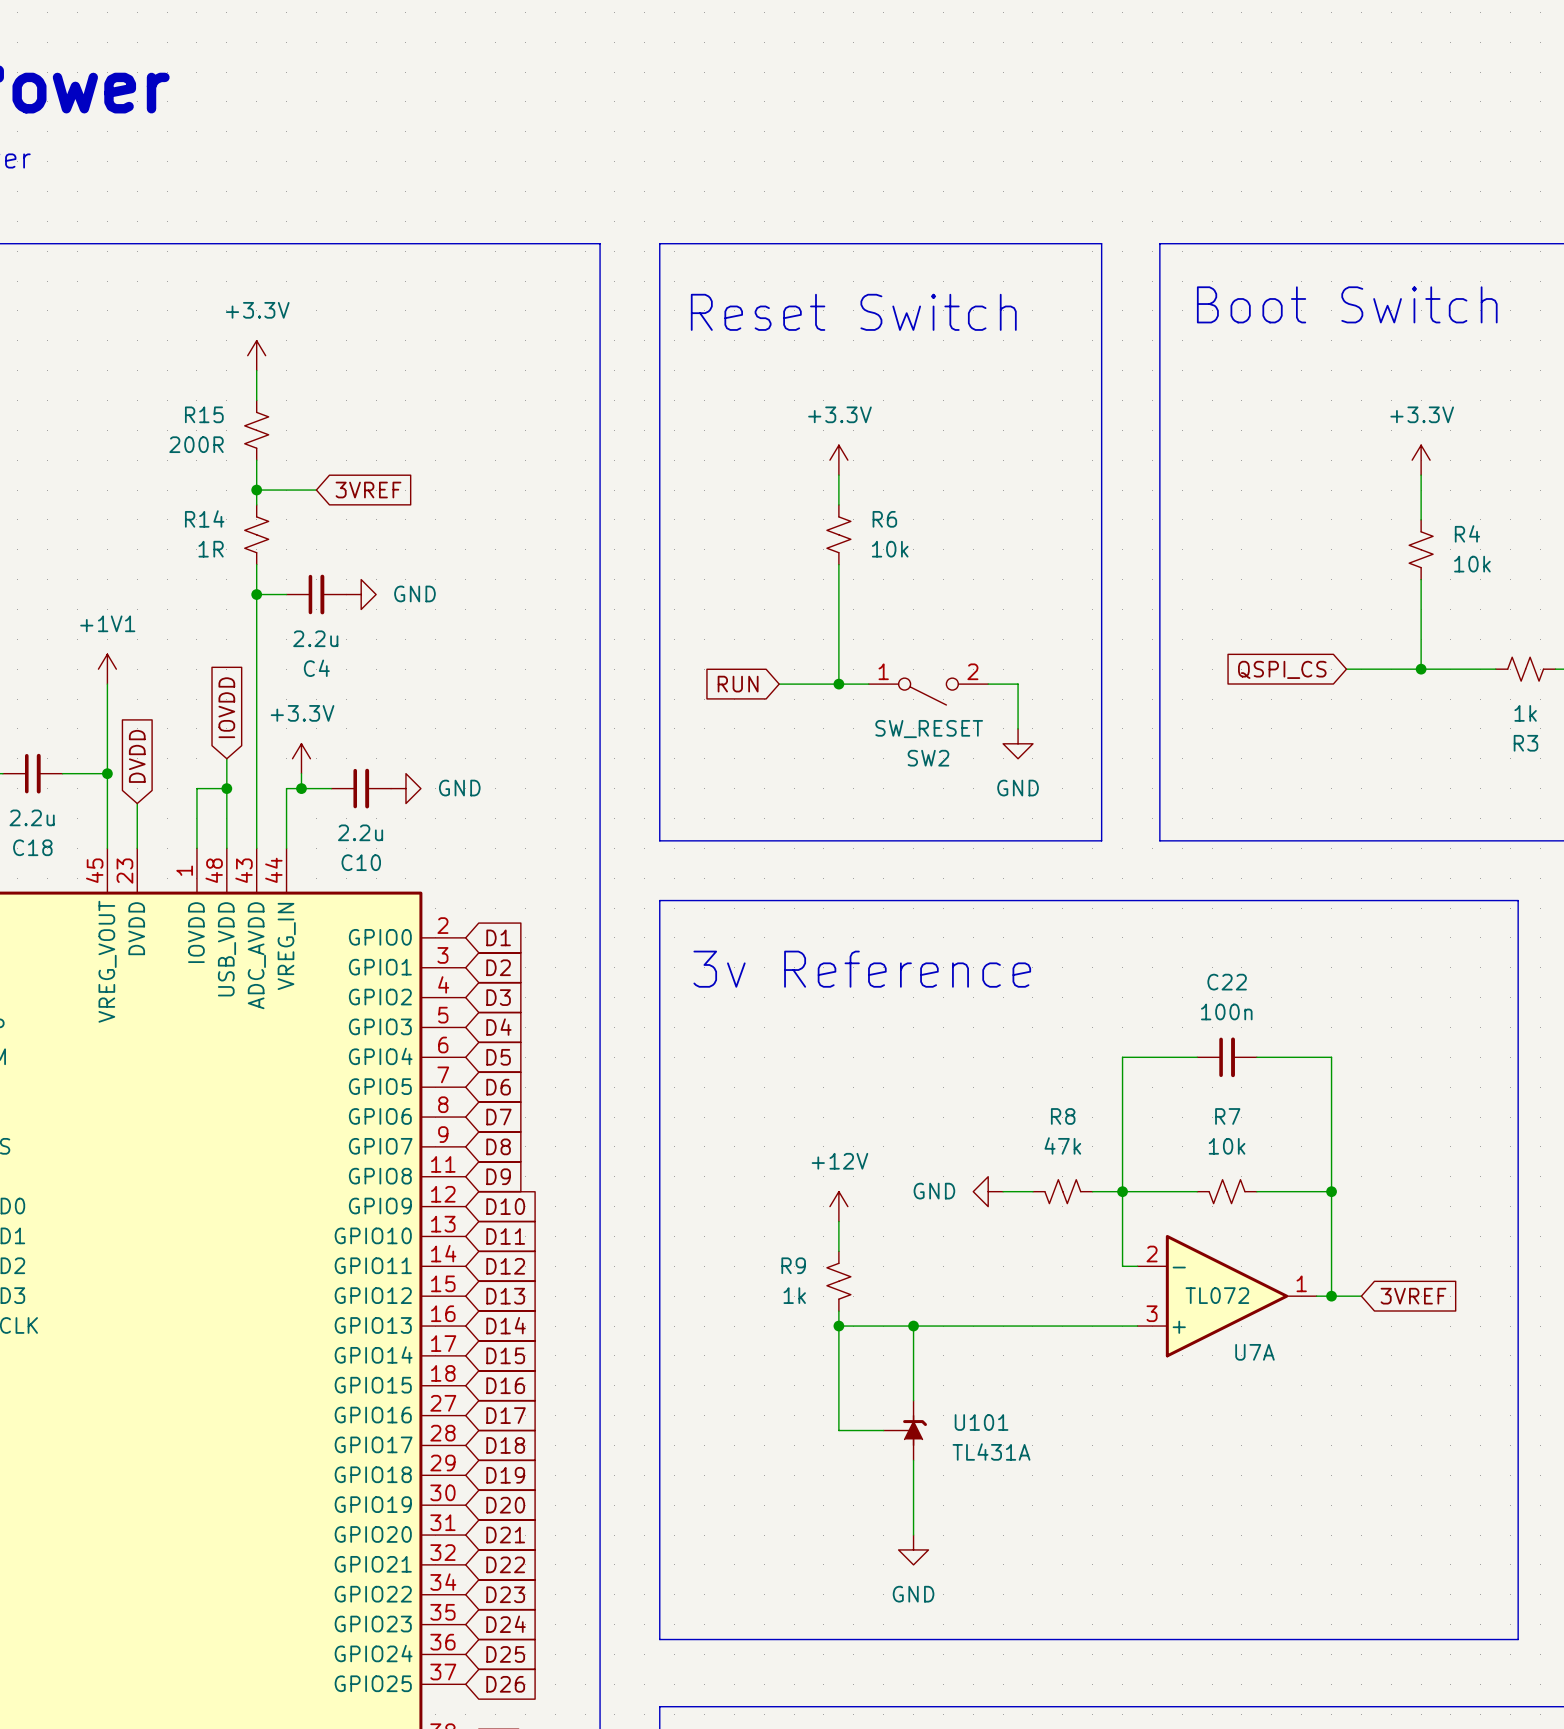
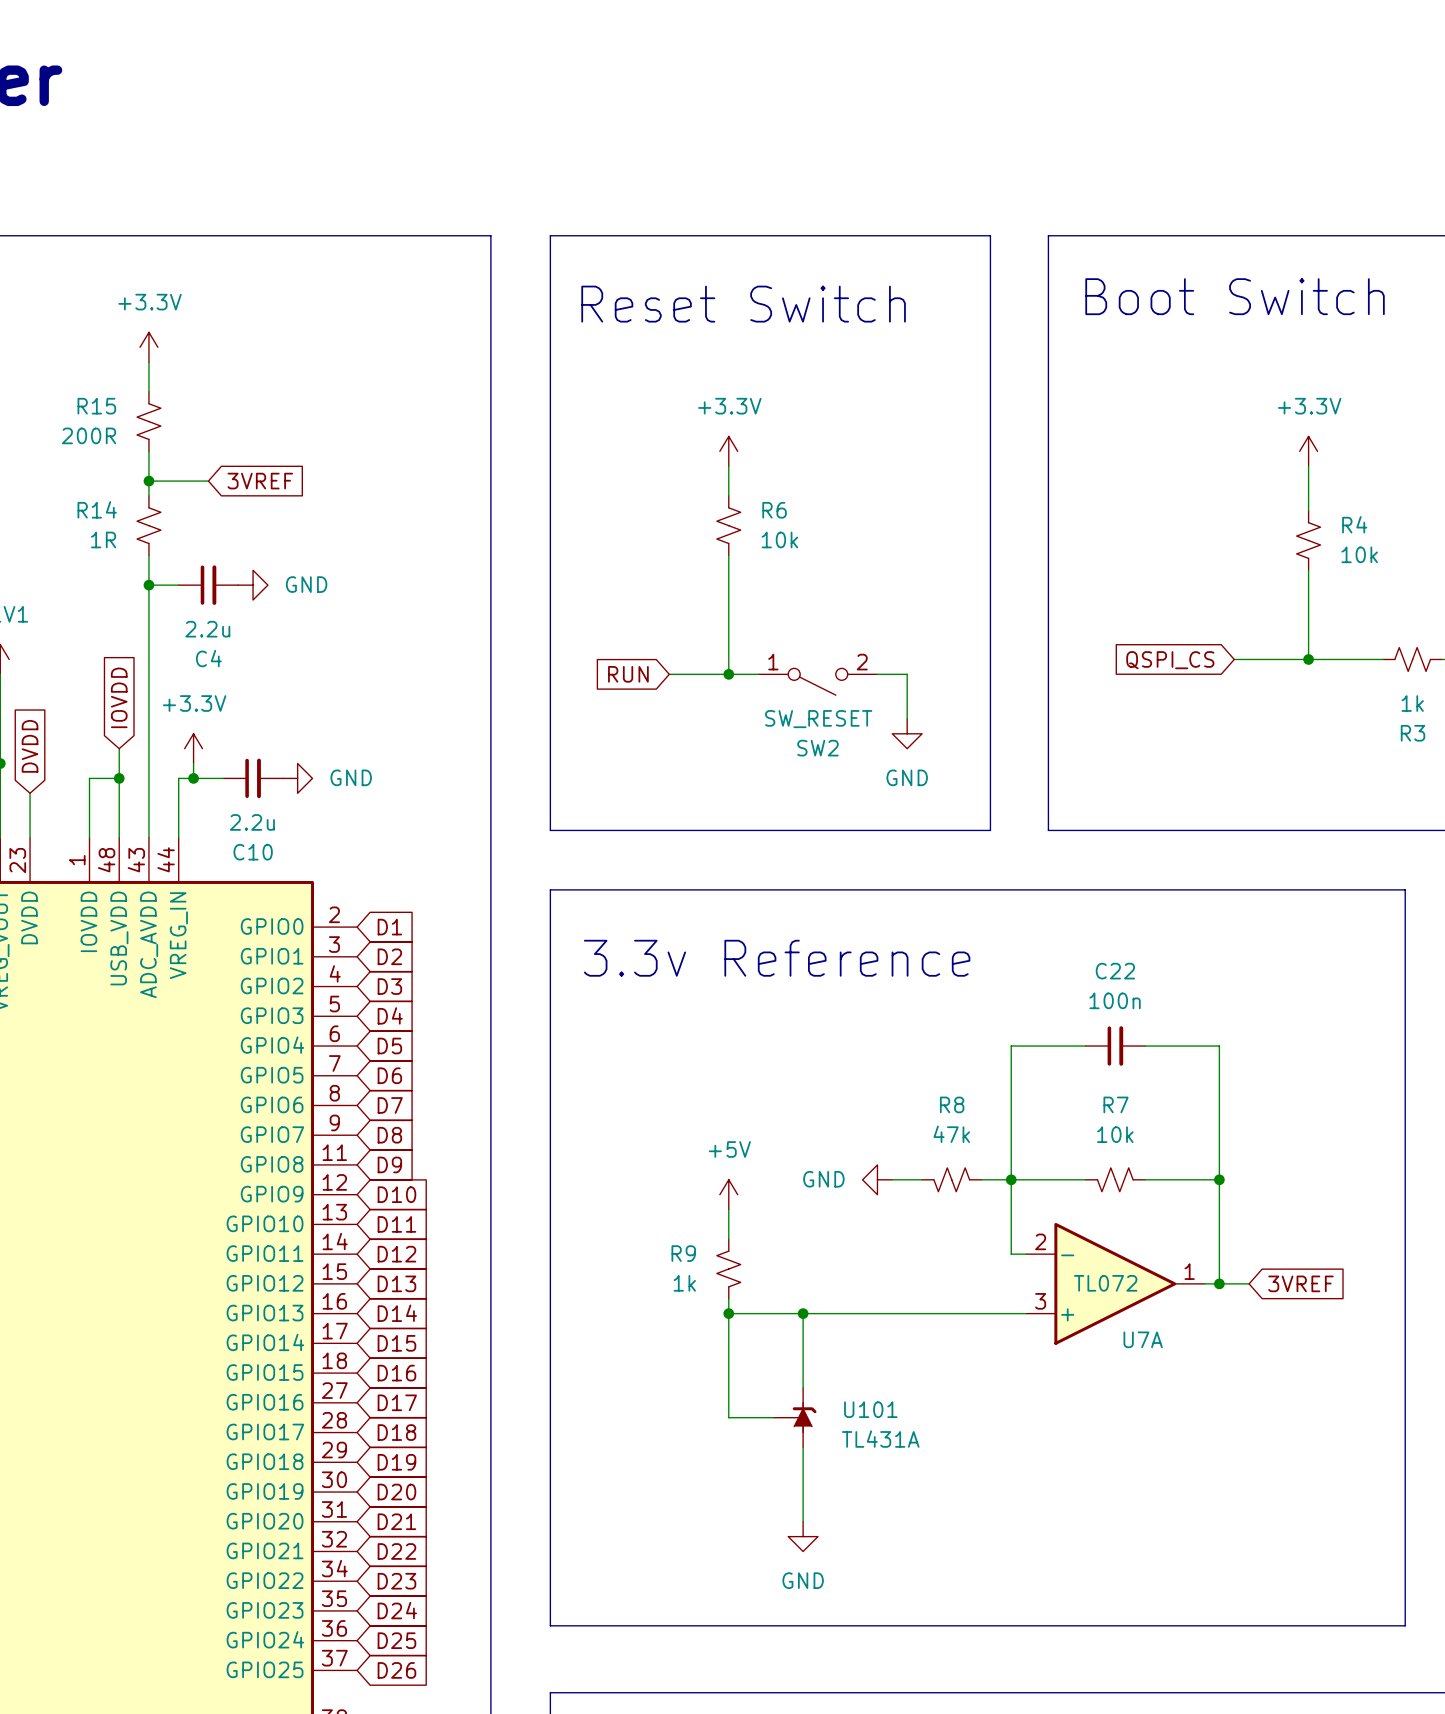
text: 3v Reference (862, 969) -> 3.3v Reference (777, 958)
power symbol: +12V (838, 1206) -> +5V (728, 1194)

